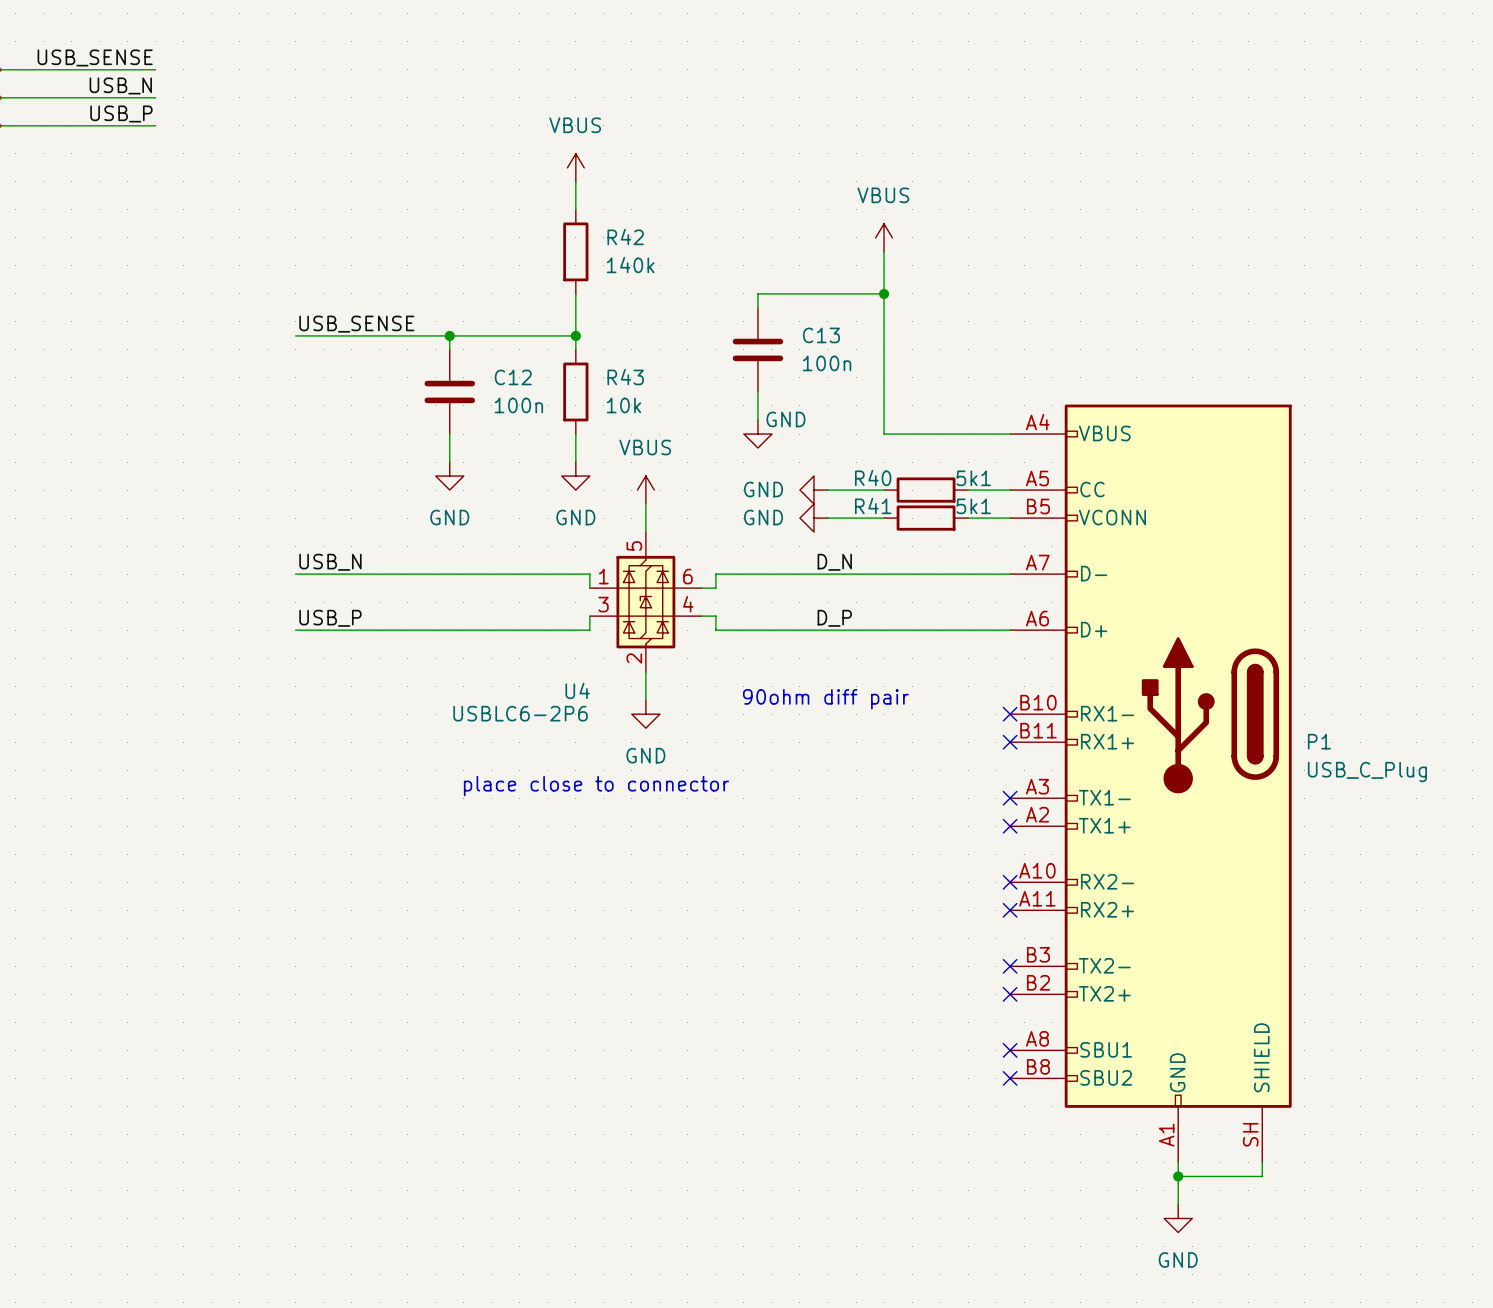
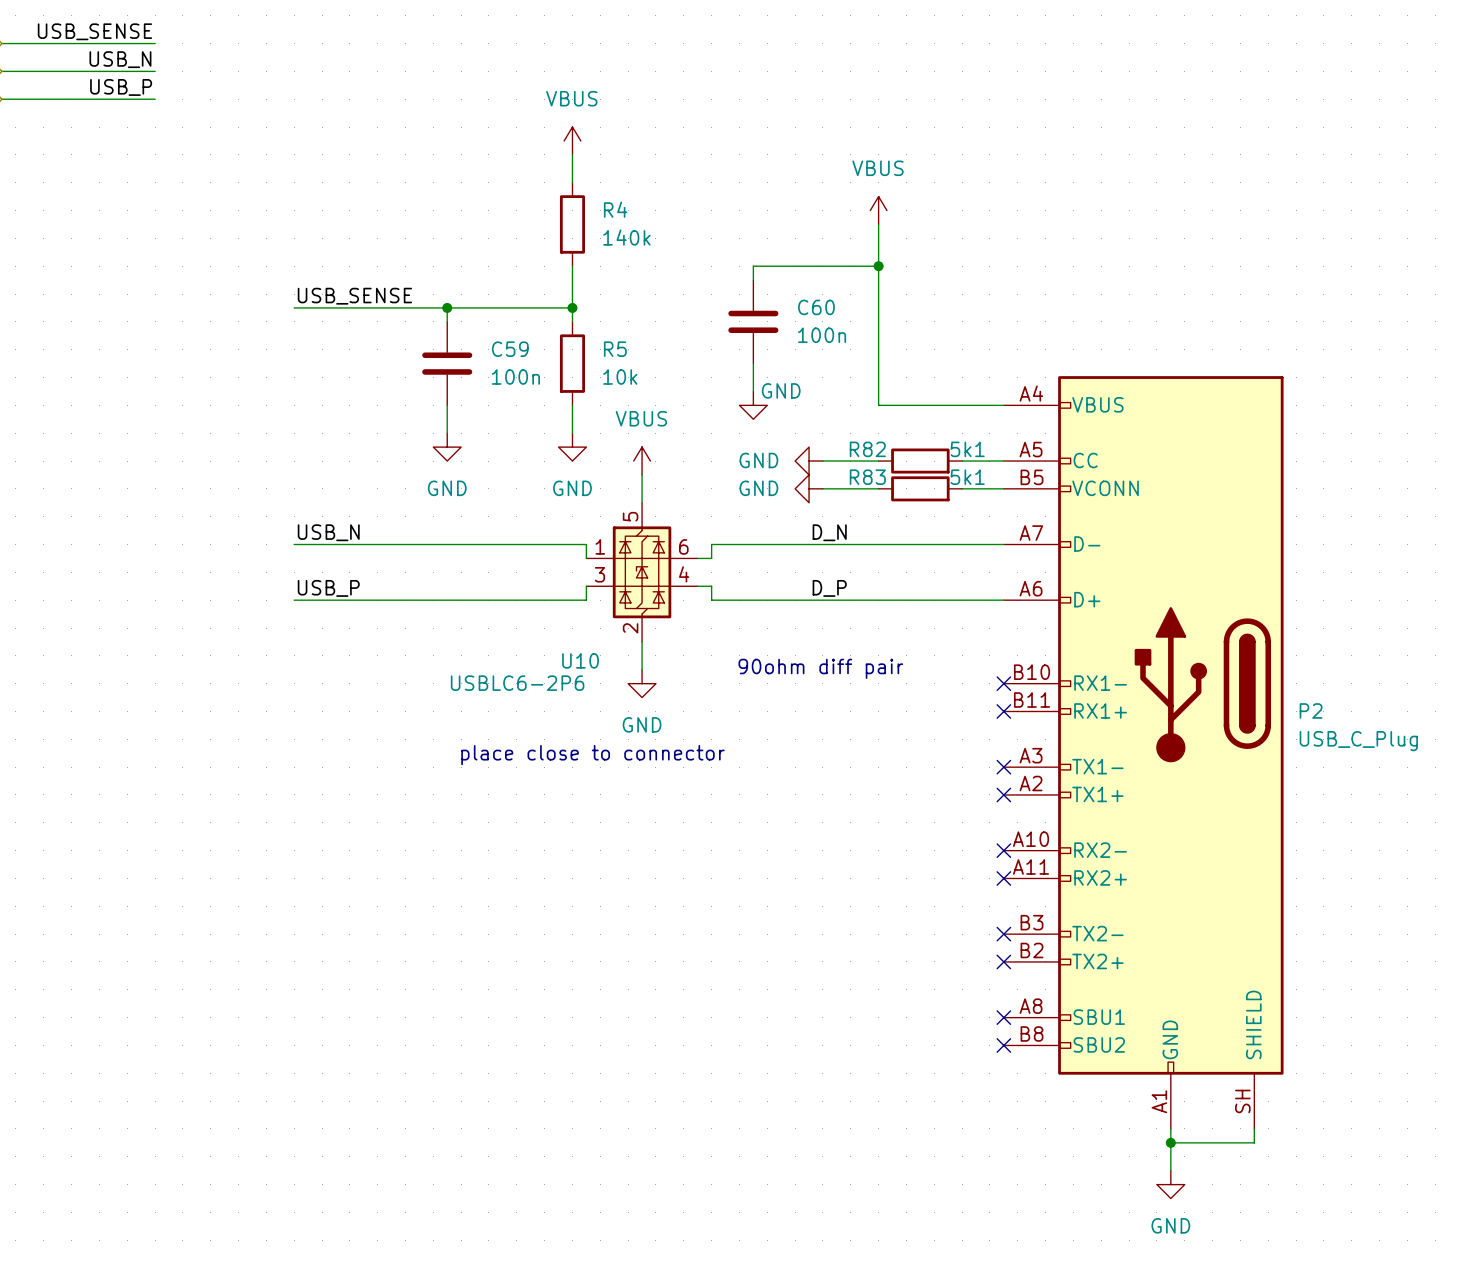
R42 name: R42 (625, 237) -> R4 (615, 209)
C13 name: C13 (821, 335) -> C60 (816, 307)
C12 name: C12 (513, 377) -> C59 (510, 349)
R43 name: R43 (625, 377) -> R5 (615, 349)
R40 name: R40 (873, 477) -> R82 (867, 449)
R41 name: R41 (873, 506) -> R83 (867, 477)
U4 name: U4 (577, 690) -> U10 (580, 660)
P1 name: P1 (1319, 741) -> P2 (1311, 710)

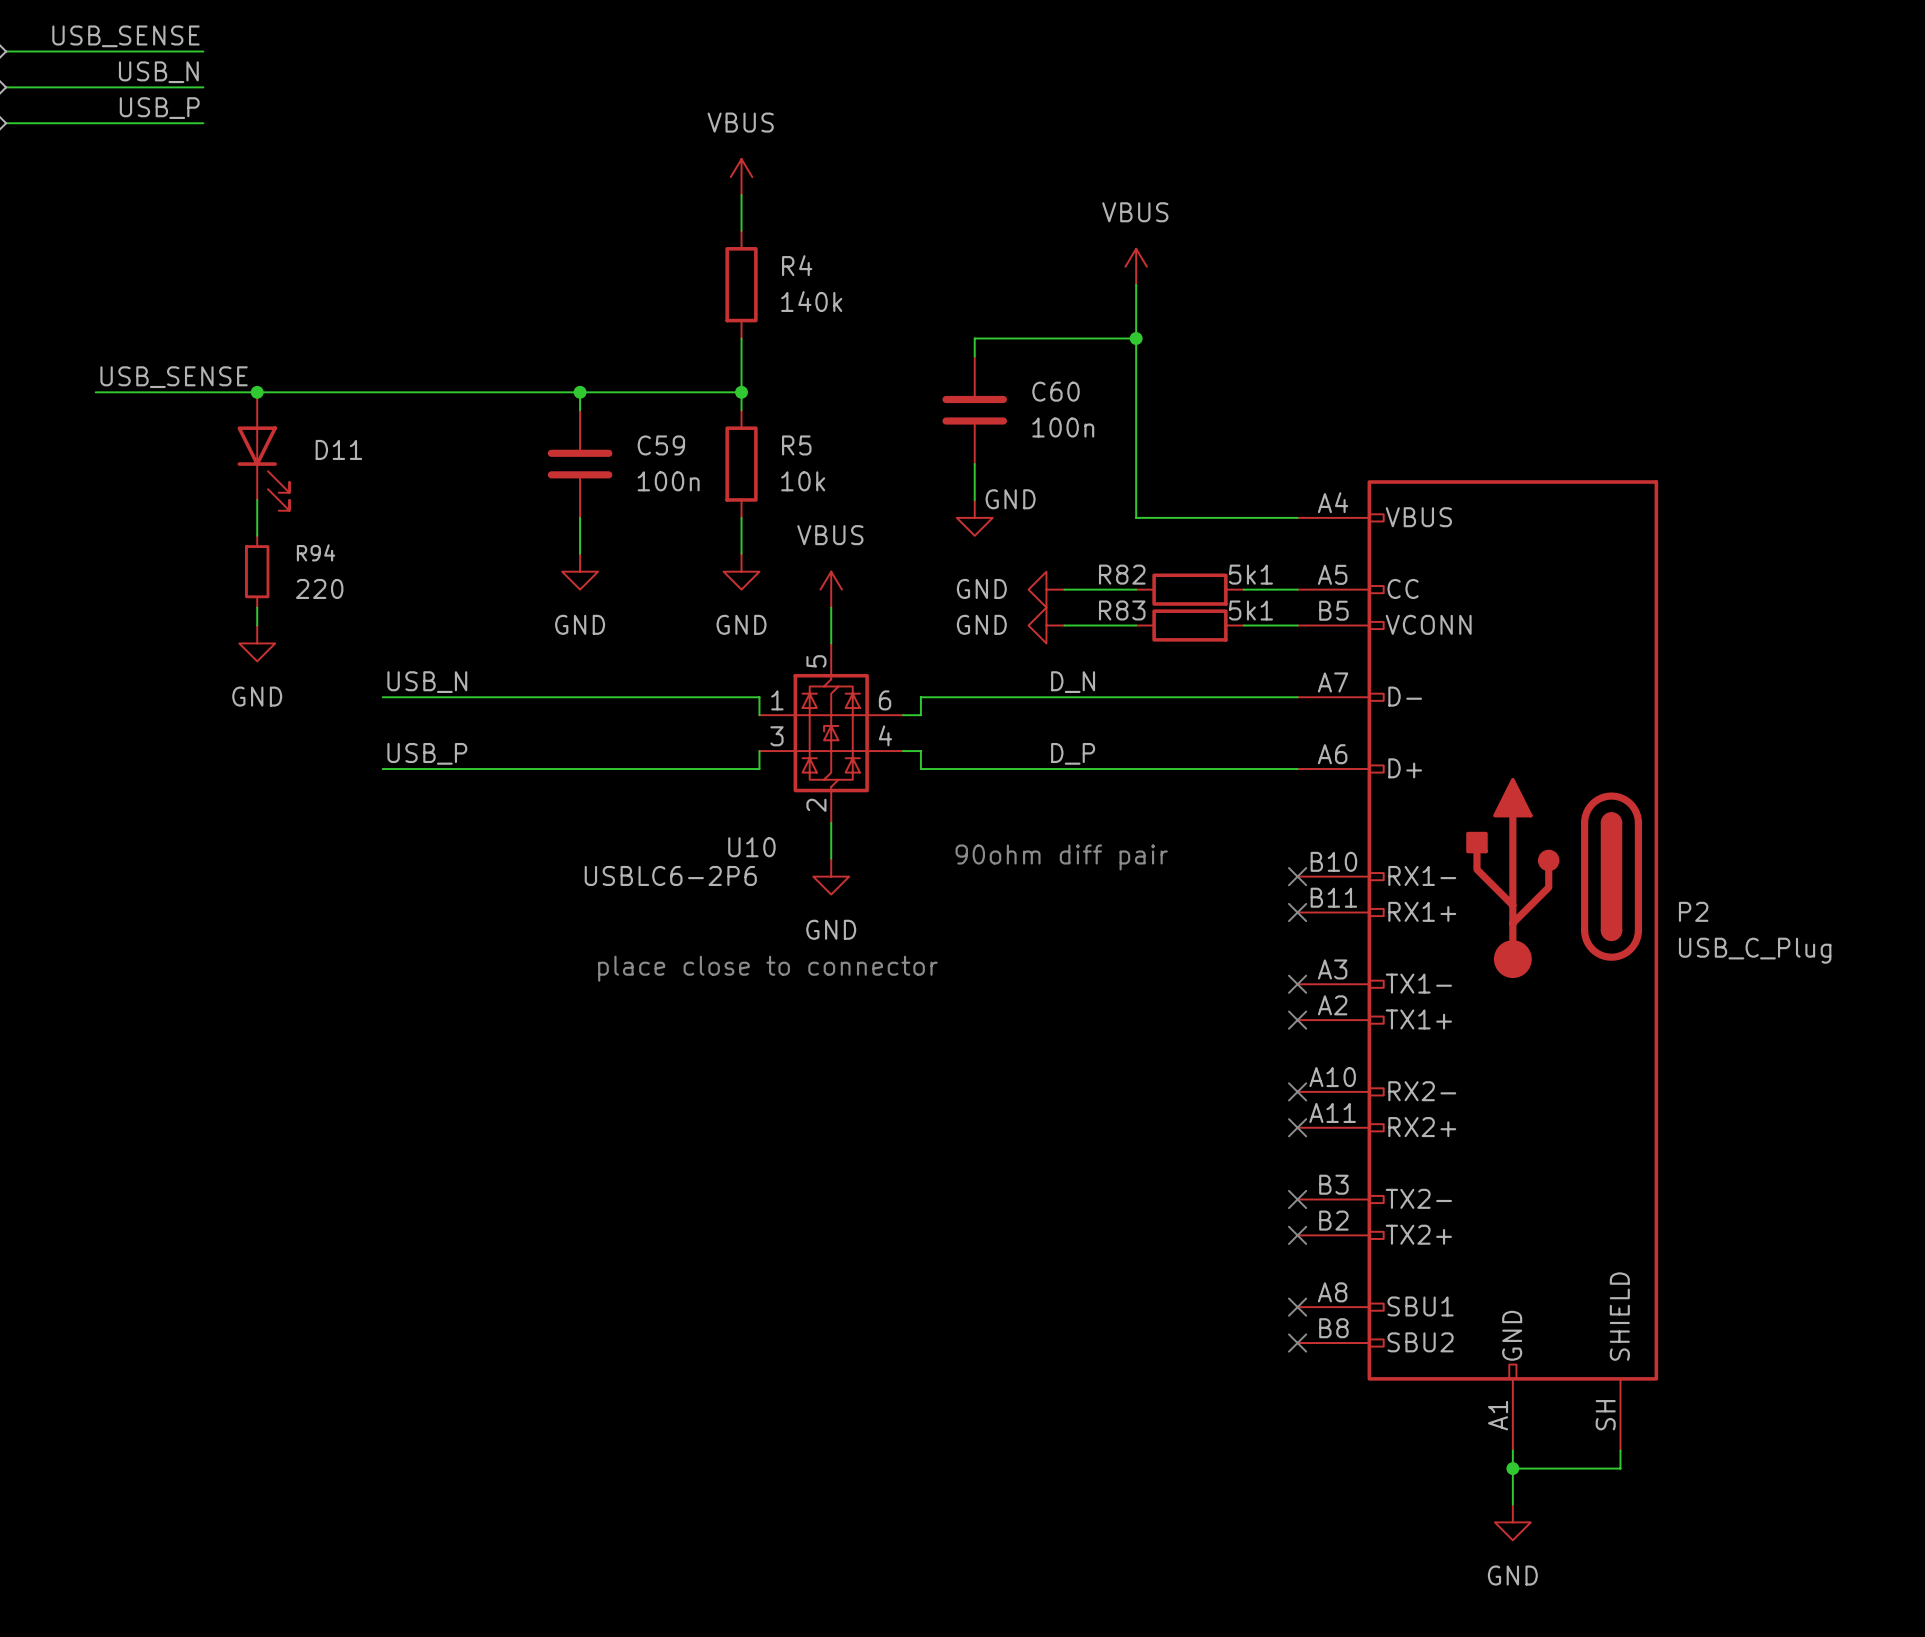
label position: USB_SENSE (354, 296) -> USB_SENSE (174, 377)
wire: none -> (95, 392) (382, 392)
junction: none -> (257, 392)
D11: none -> (263, 451)
wire: none -> (257, 499) (257, 535)
R94: none -> 220 (257, 571)
wire: none -> (257, 607) (257, 625)
power symbol: none -> GND (257, 643)

